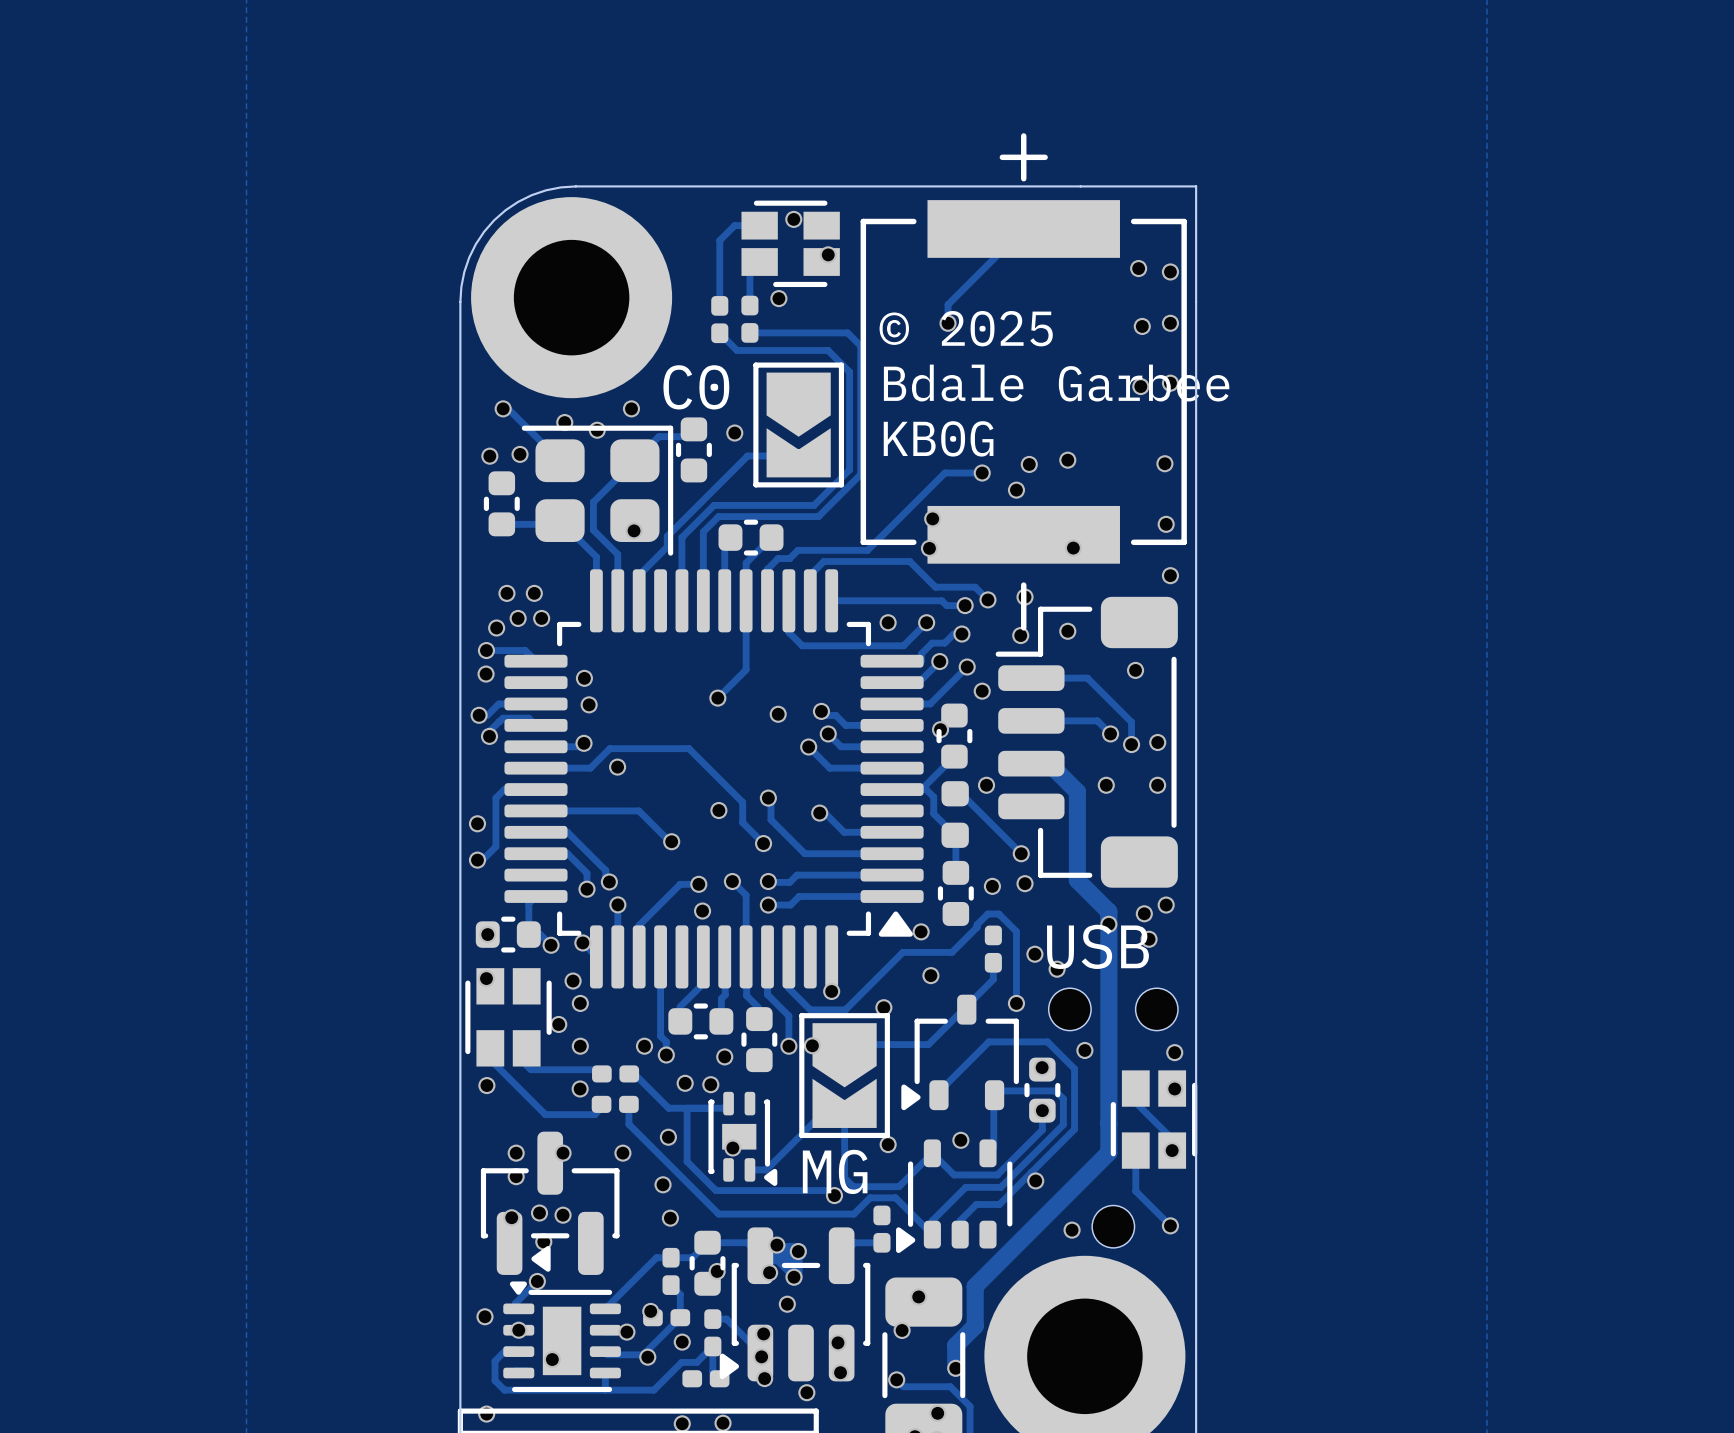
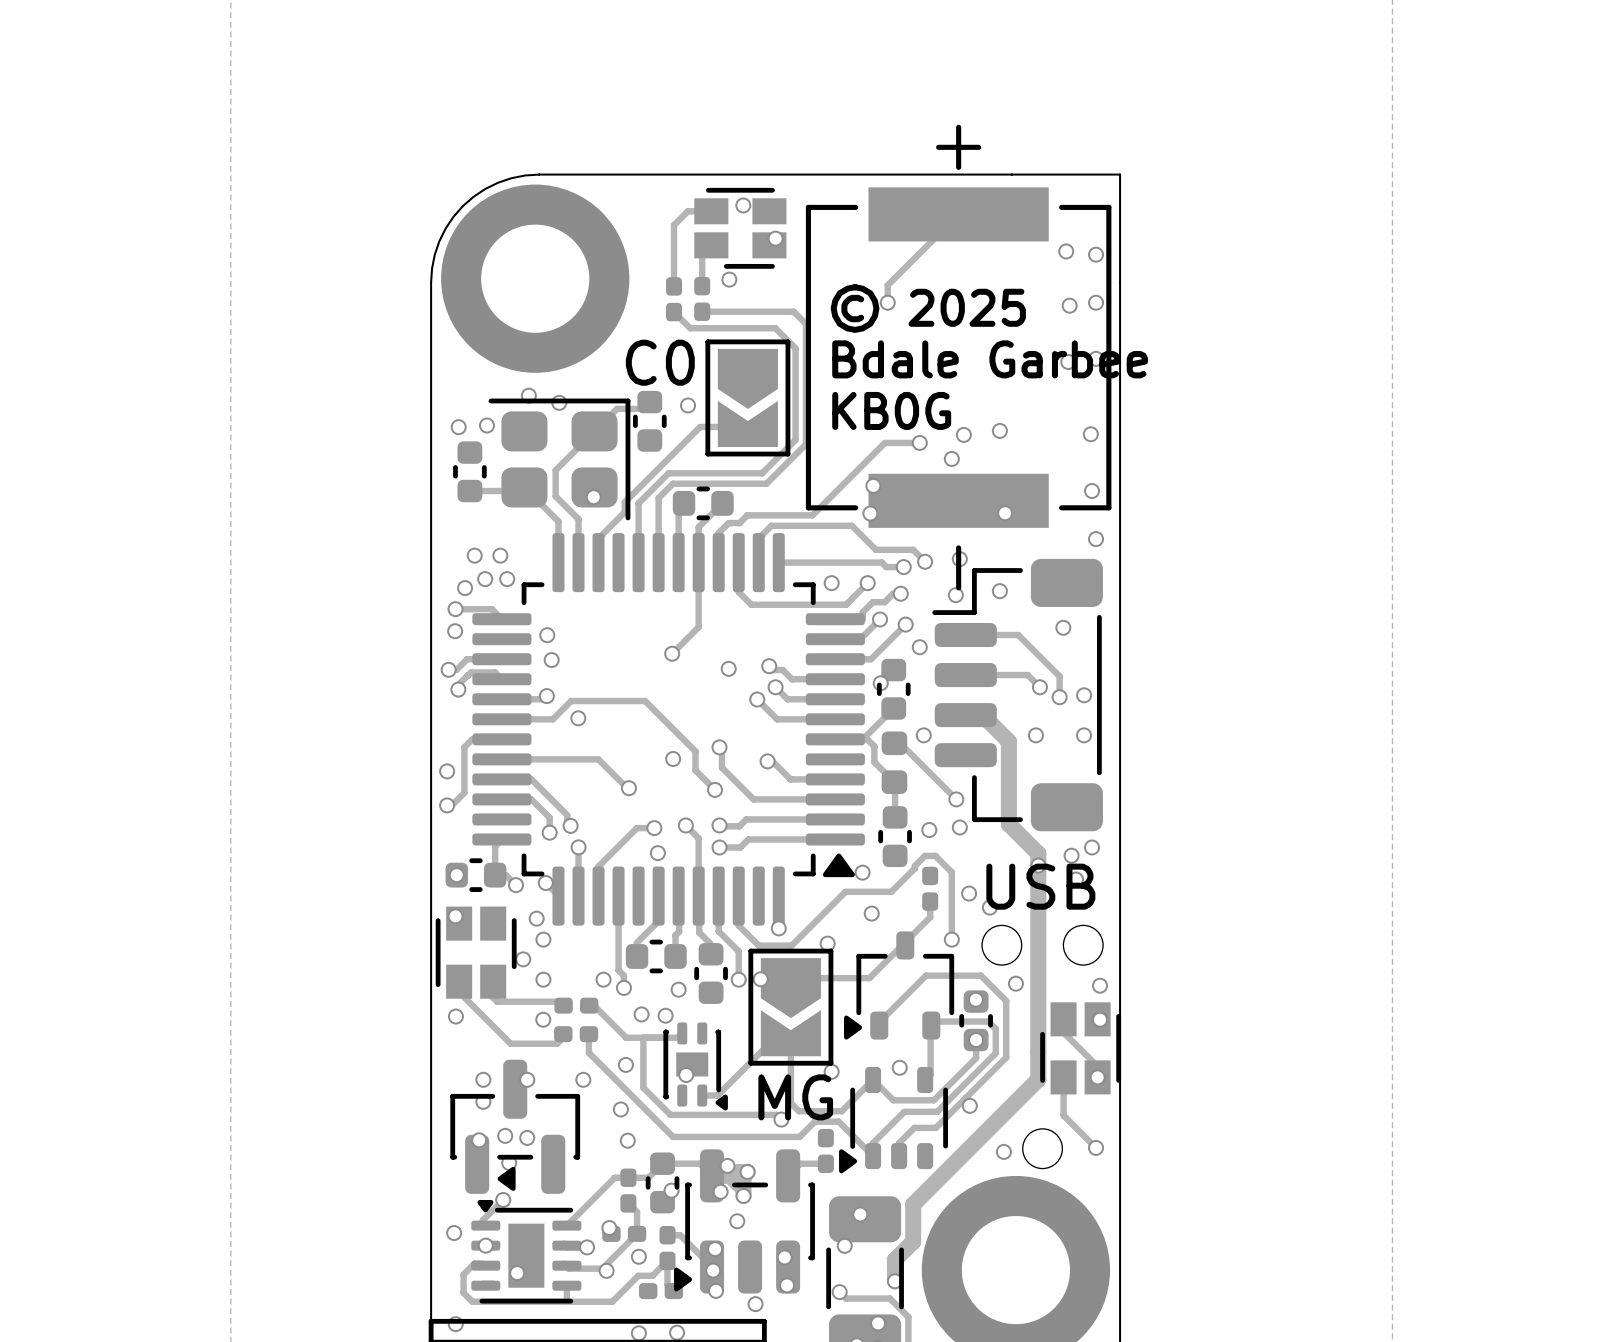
track: (503, 408) (508, 408) (560, 460) -> none
via: (503, 408) -> none
via: (631, 408) -> none

